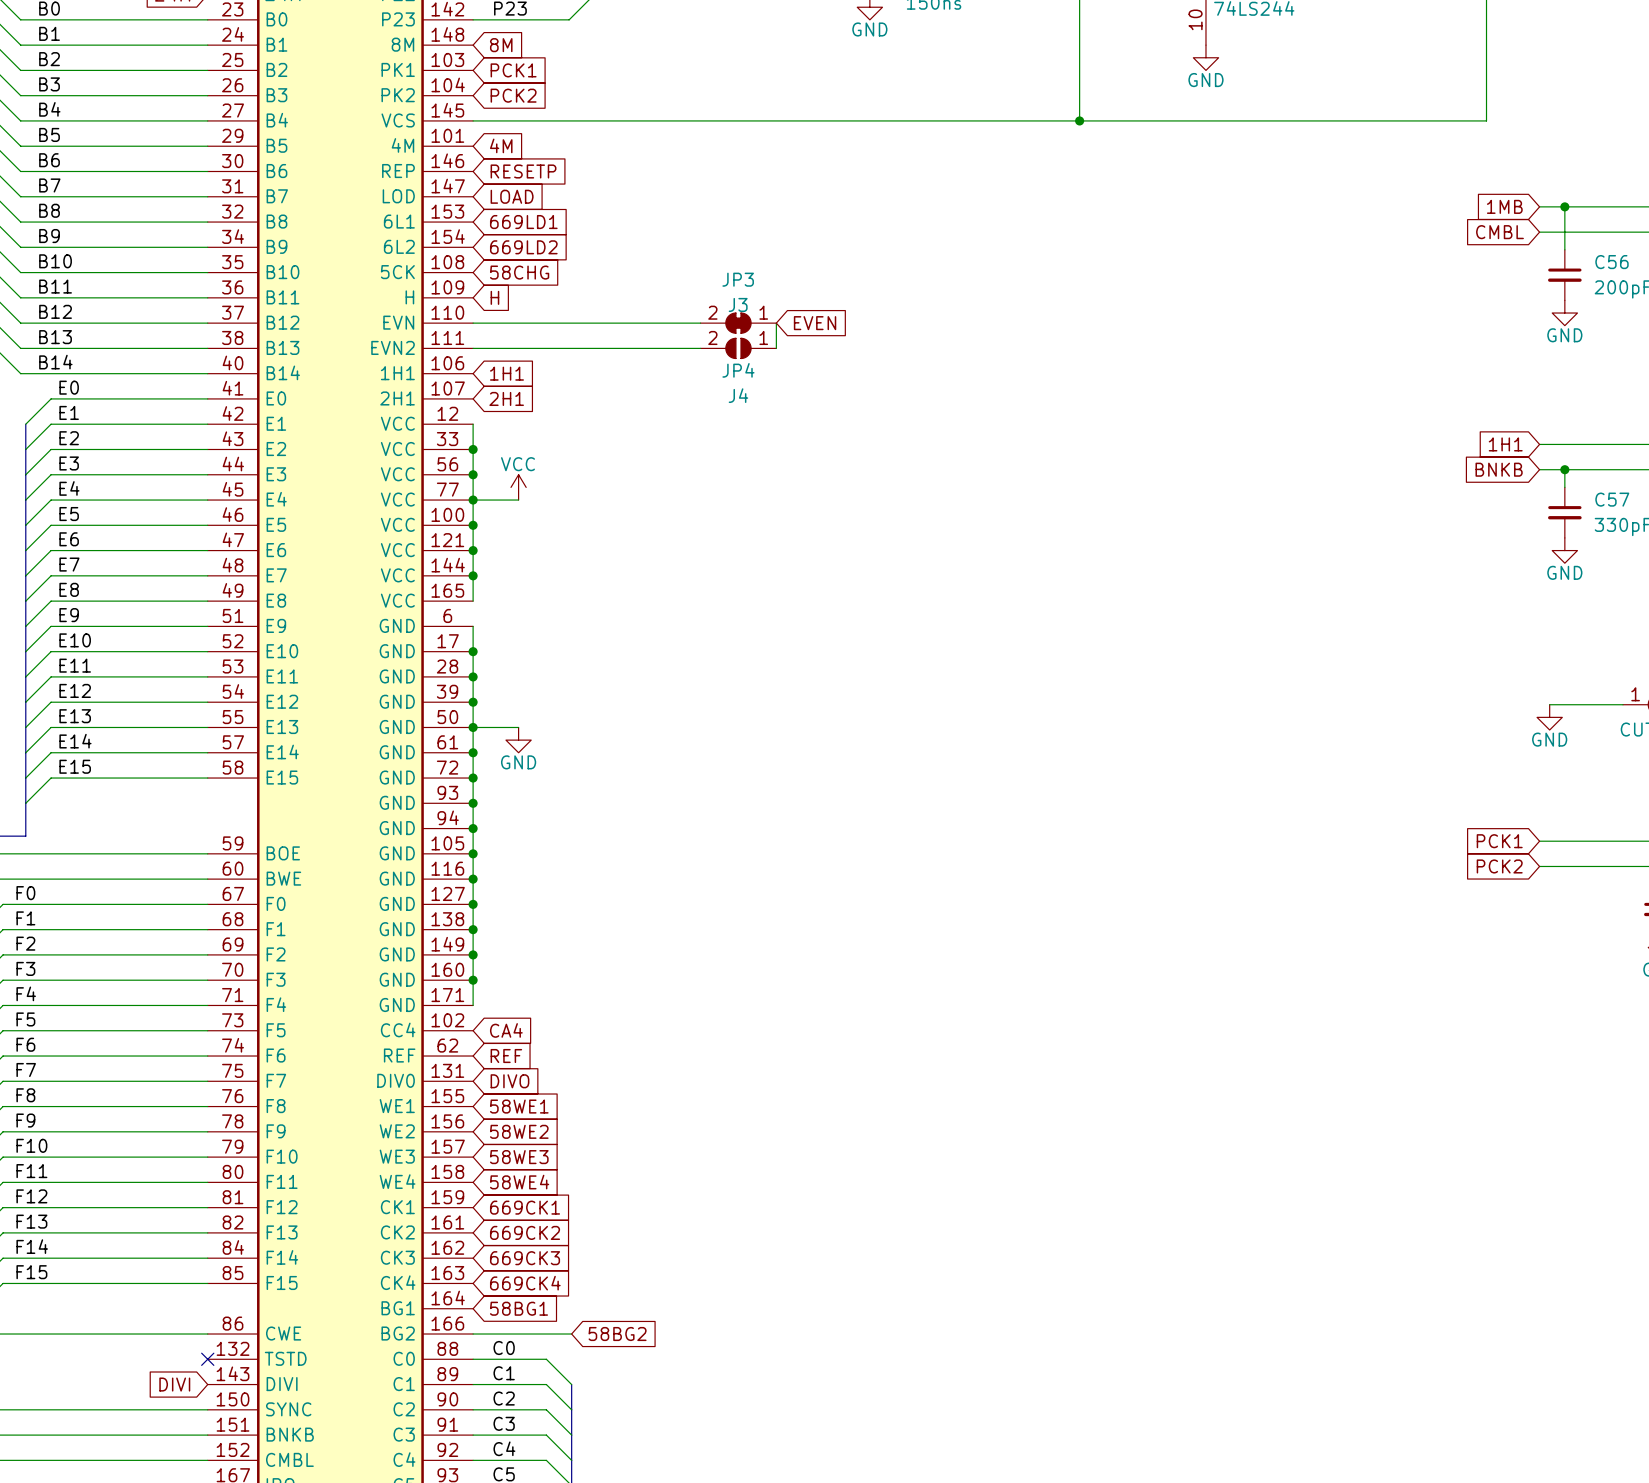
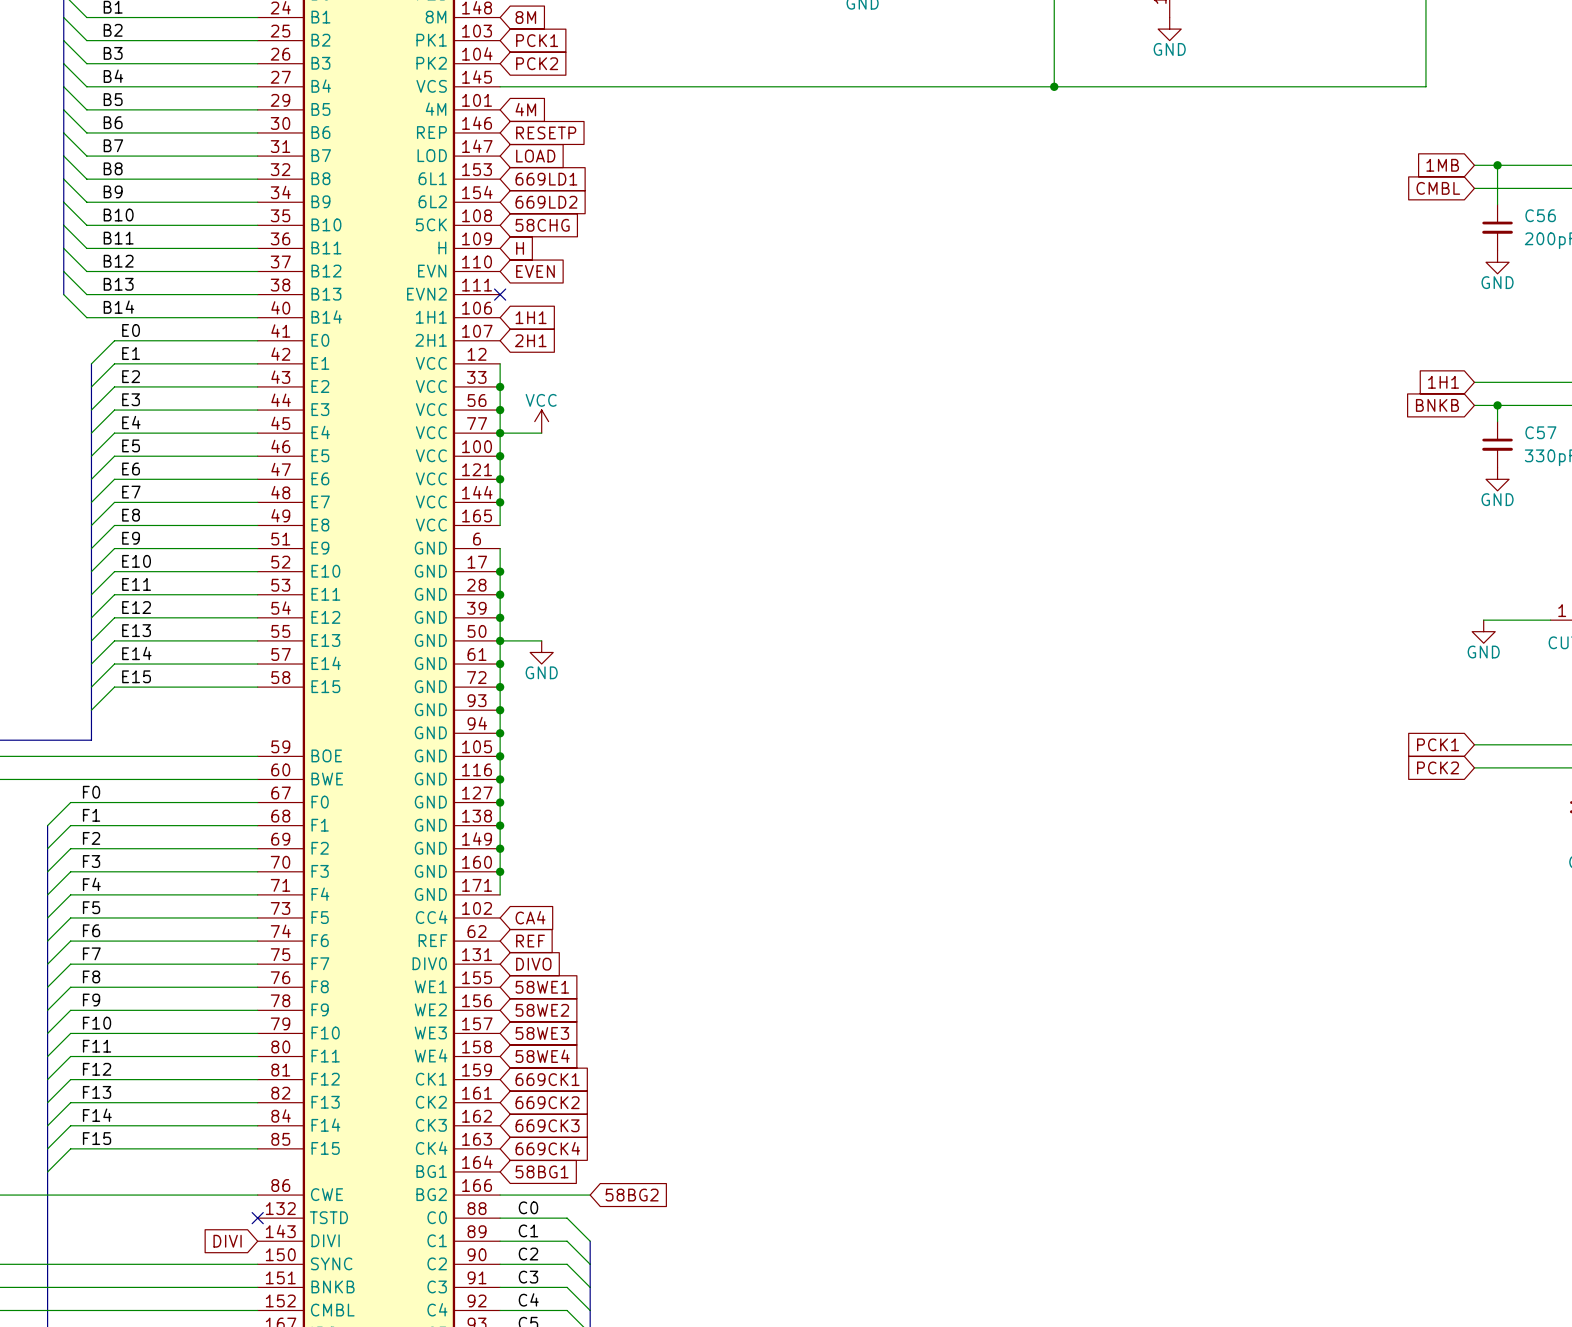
wire: (473, 323) (700, 323) -> none
global label: none -> EVEN (535, 271)
JP3: J3 (738, 323) -> none
wire: (776, 323) (776, 348) -> none
global label: EVEN (815, 323) -> none
wire: (473, 348) (700, 348) -> none
no-connect mark: none -> (500, 294)
JP4: J4 (738, 348) -> none

